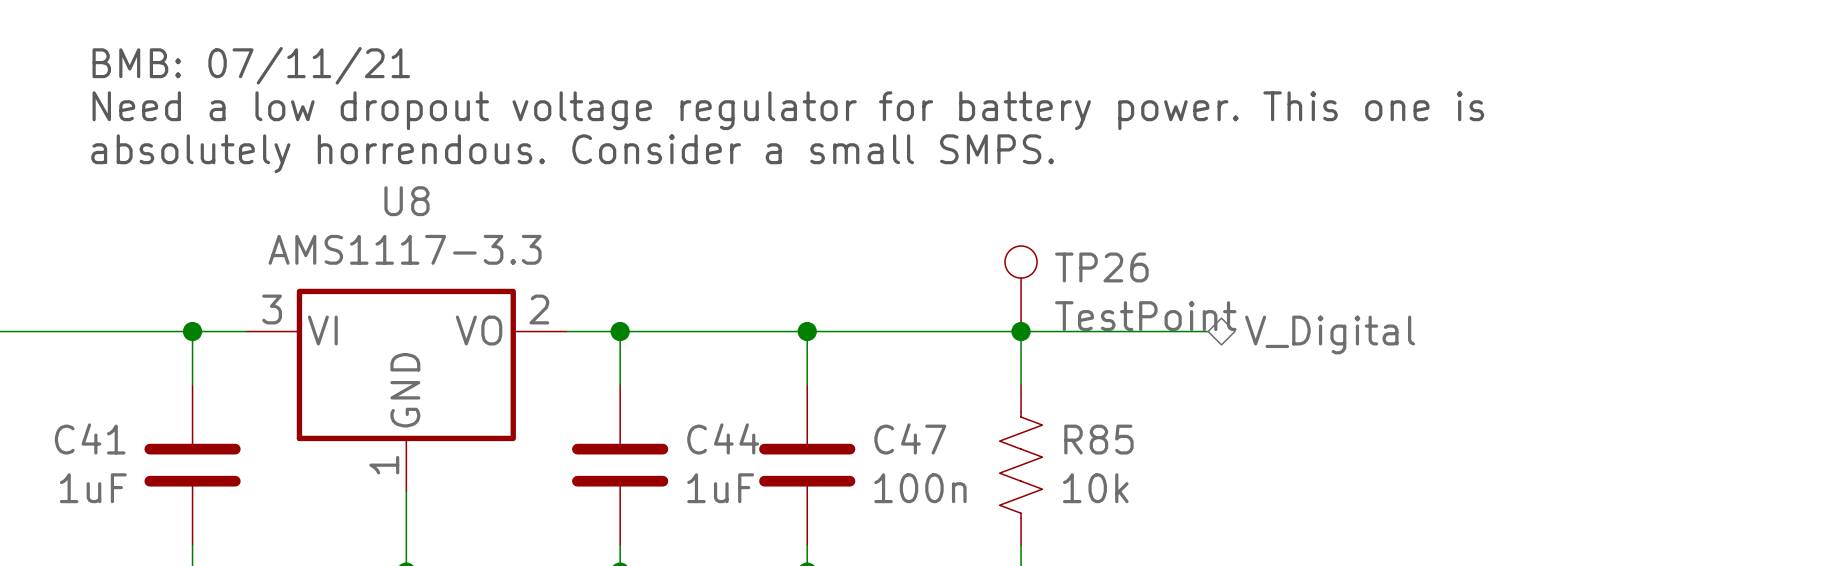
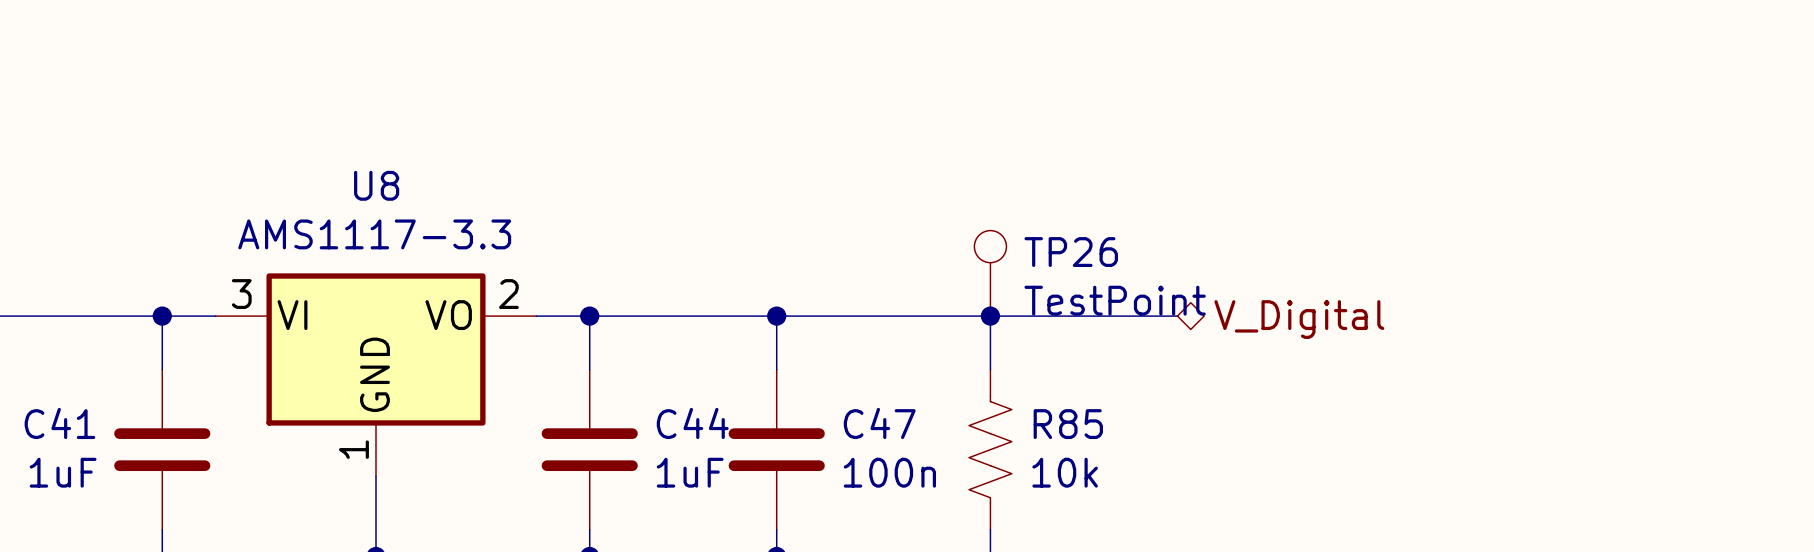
text: BMB: 07/11/21 (251, 65) -> none
text: Need a low dropout voltage regulator for battery power. This one is (788, 110) -> none
text: absolutely horrendous. Consider a small SMPS. (572, 153) -> none

